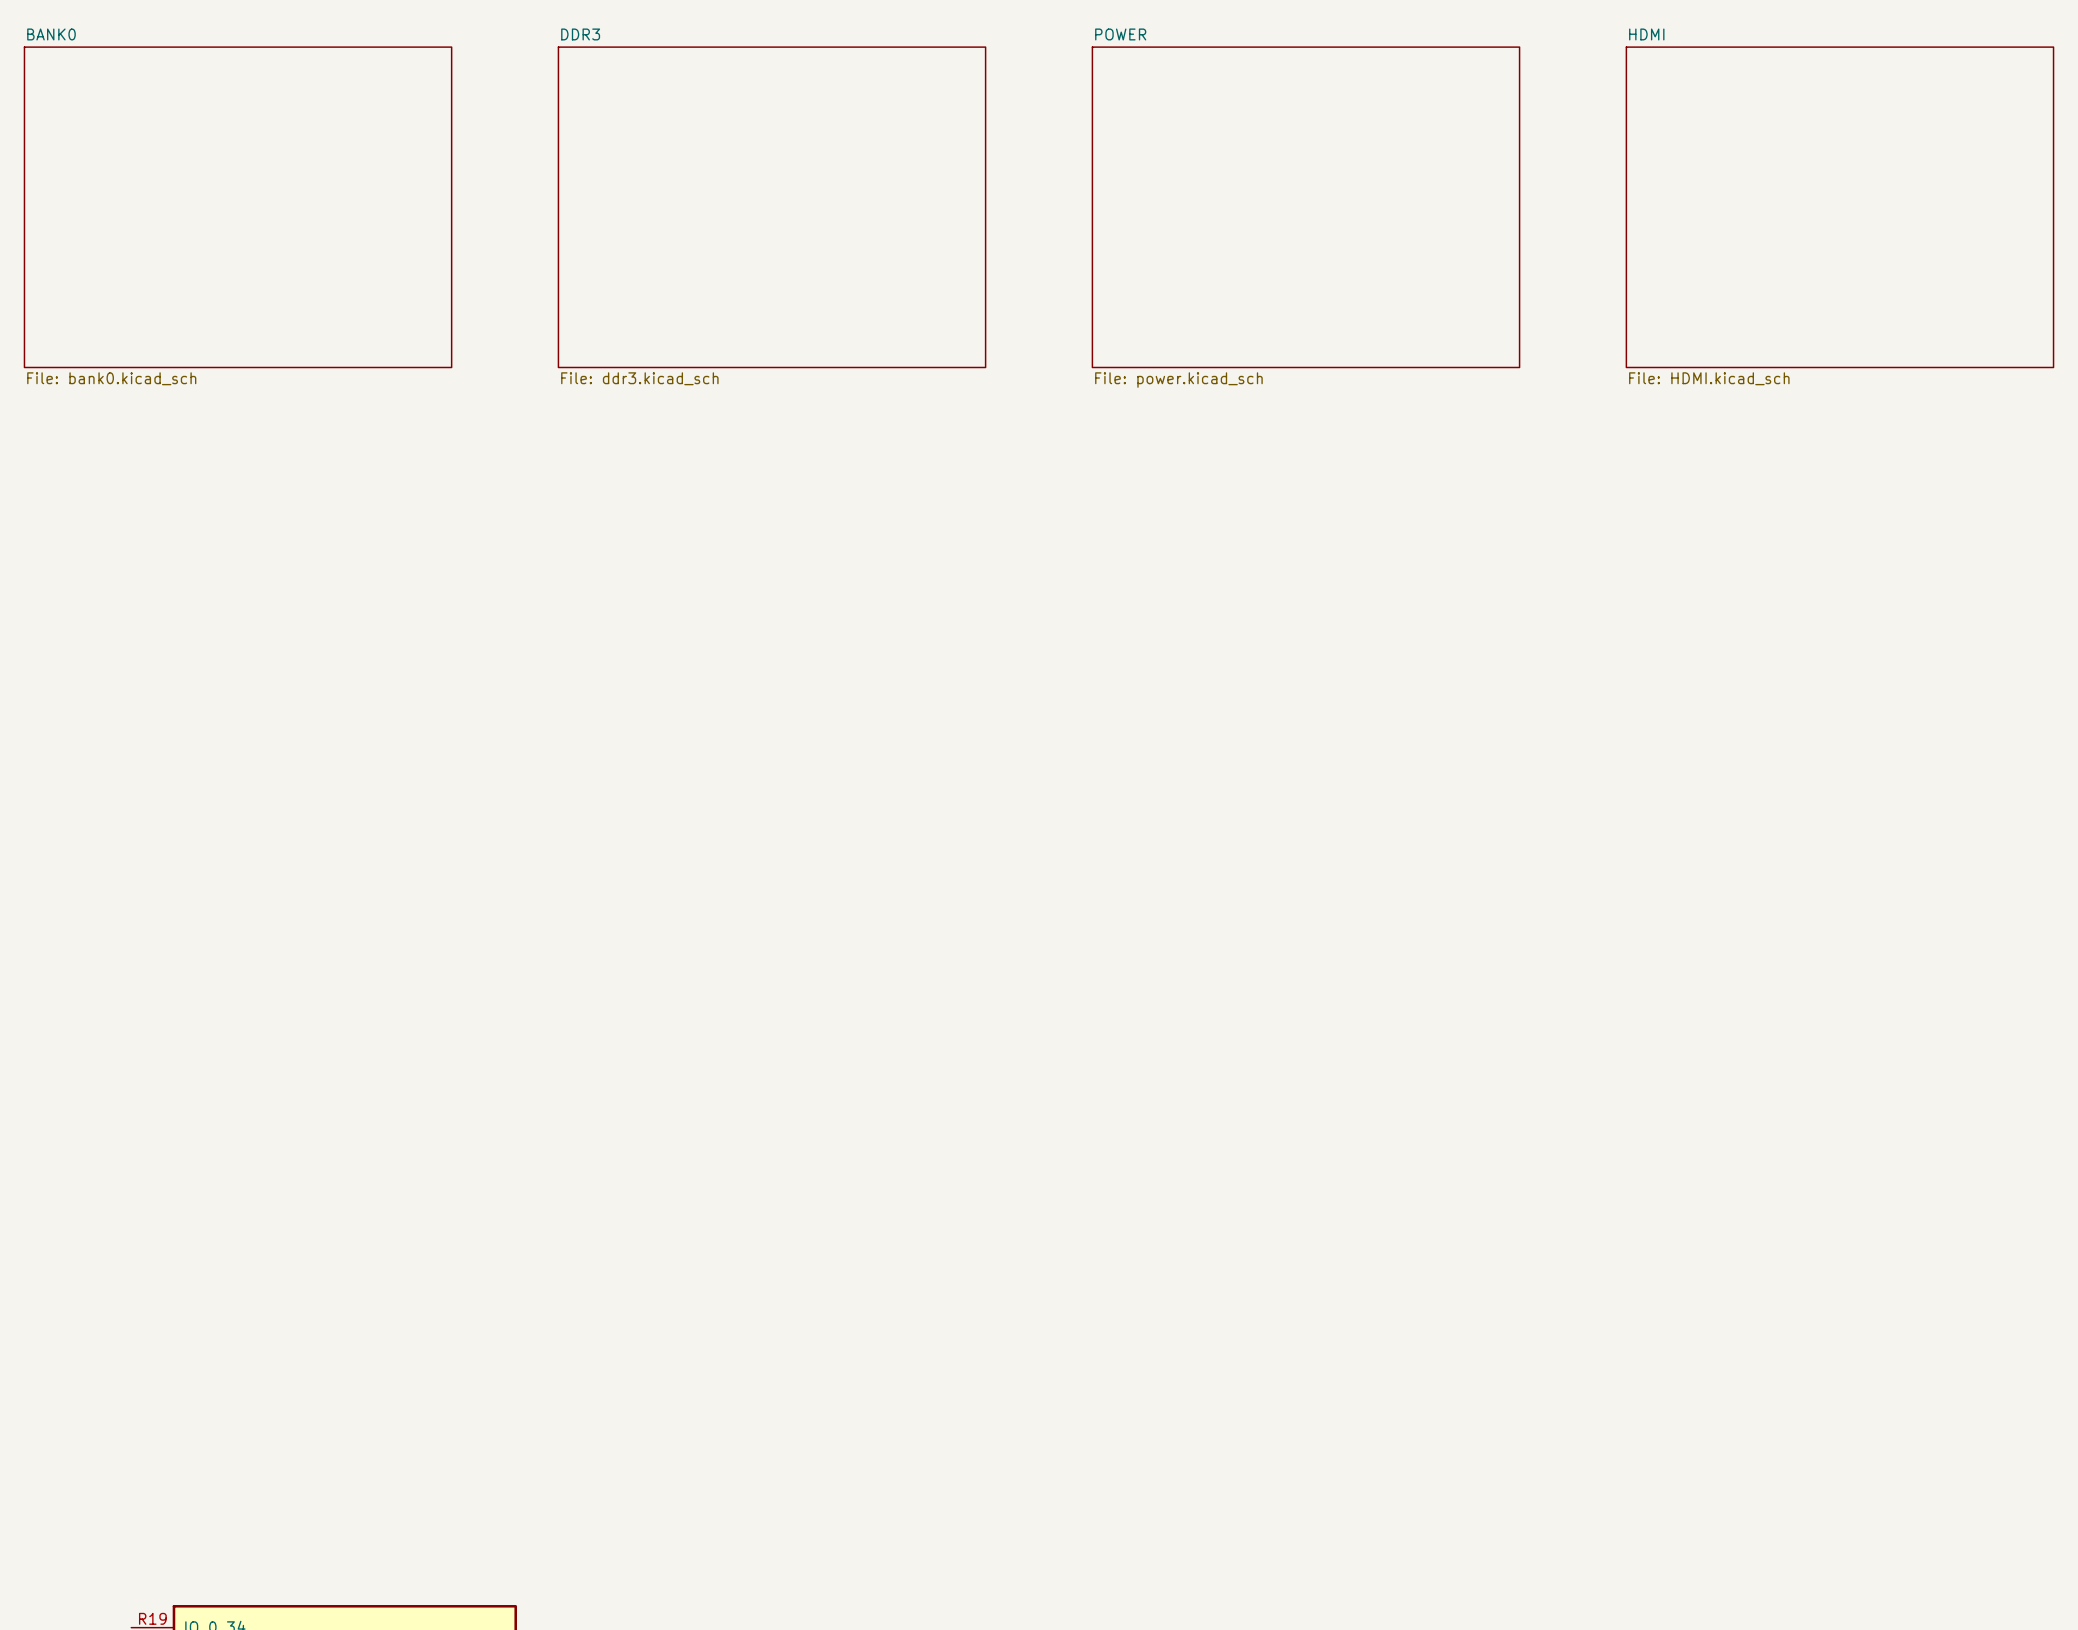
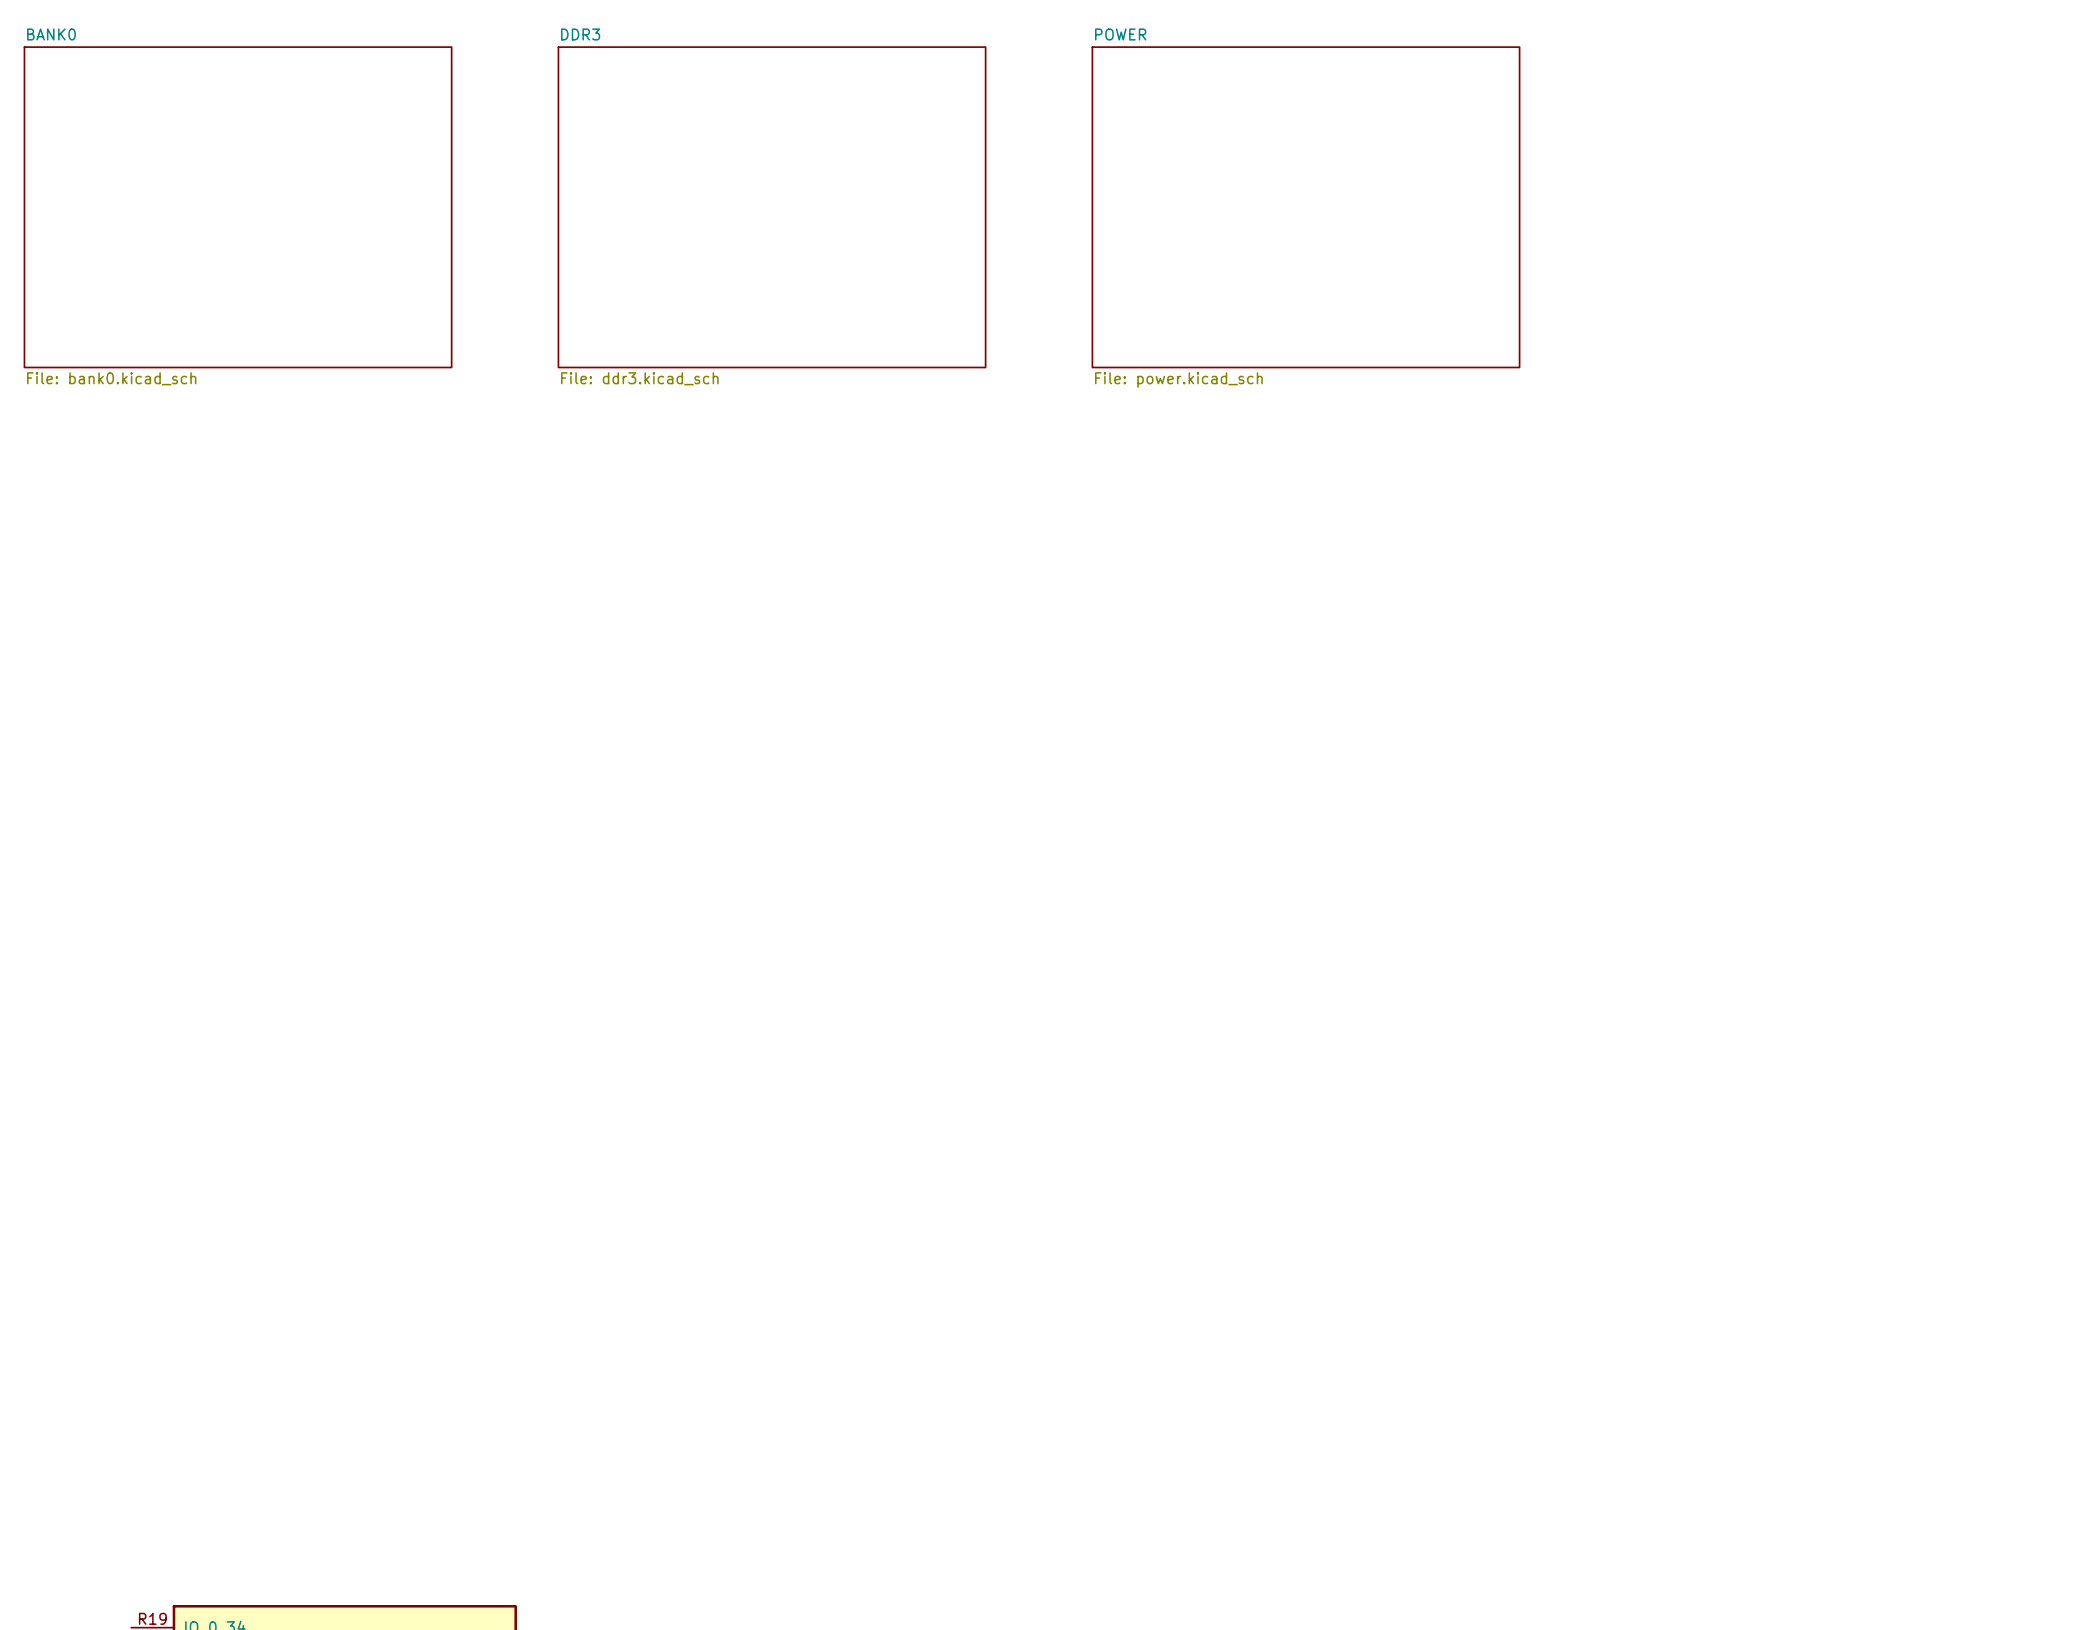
sheet HDMI: File: HDMI.kicad_sch (1839, 207) -> none

